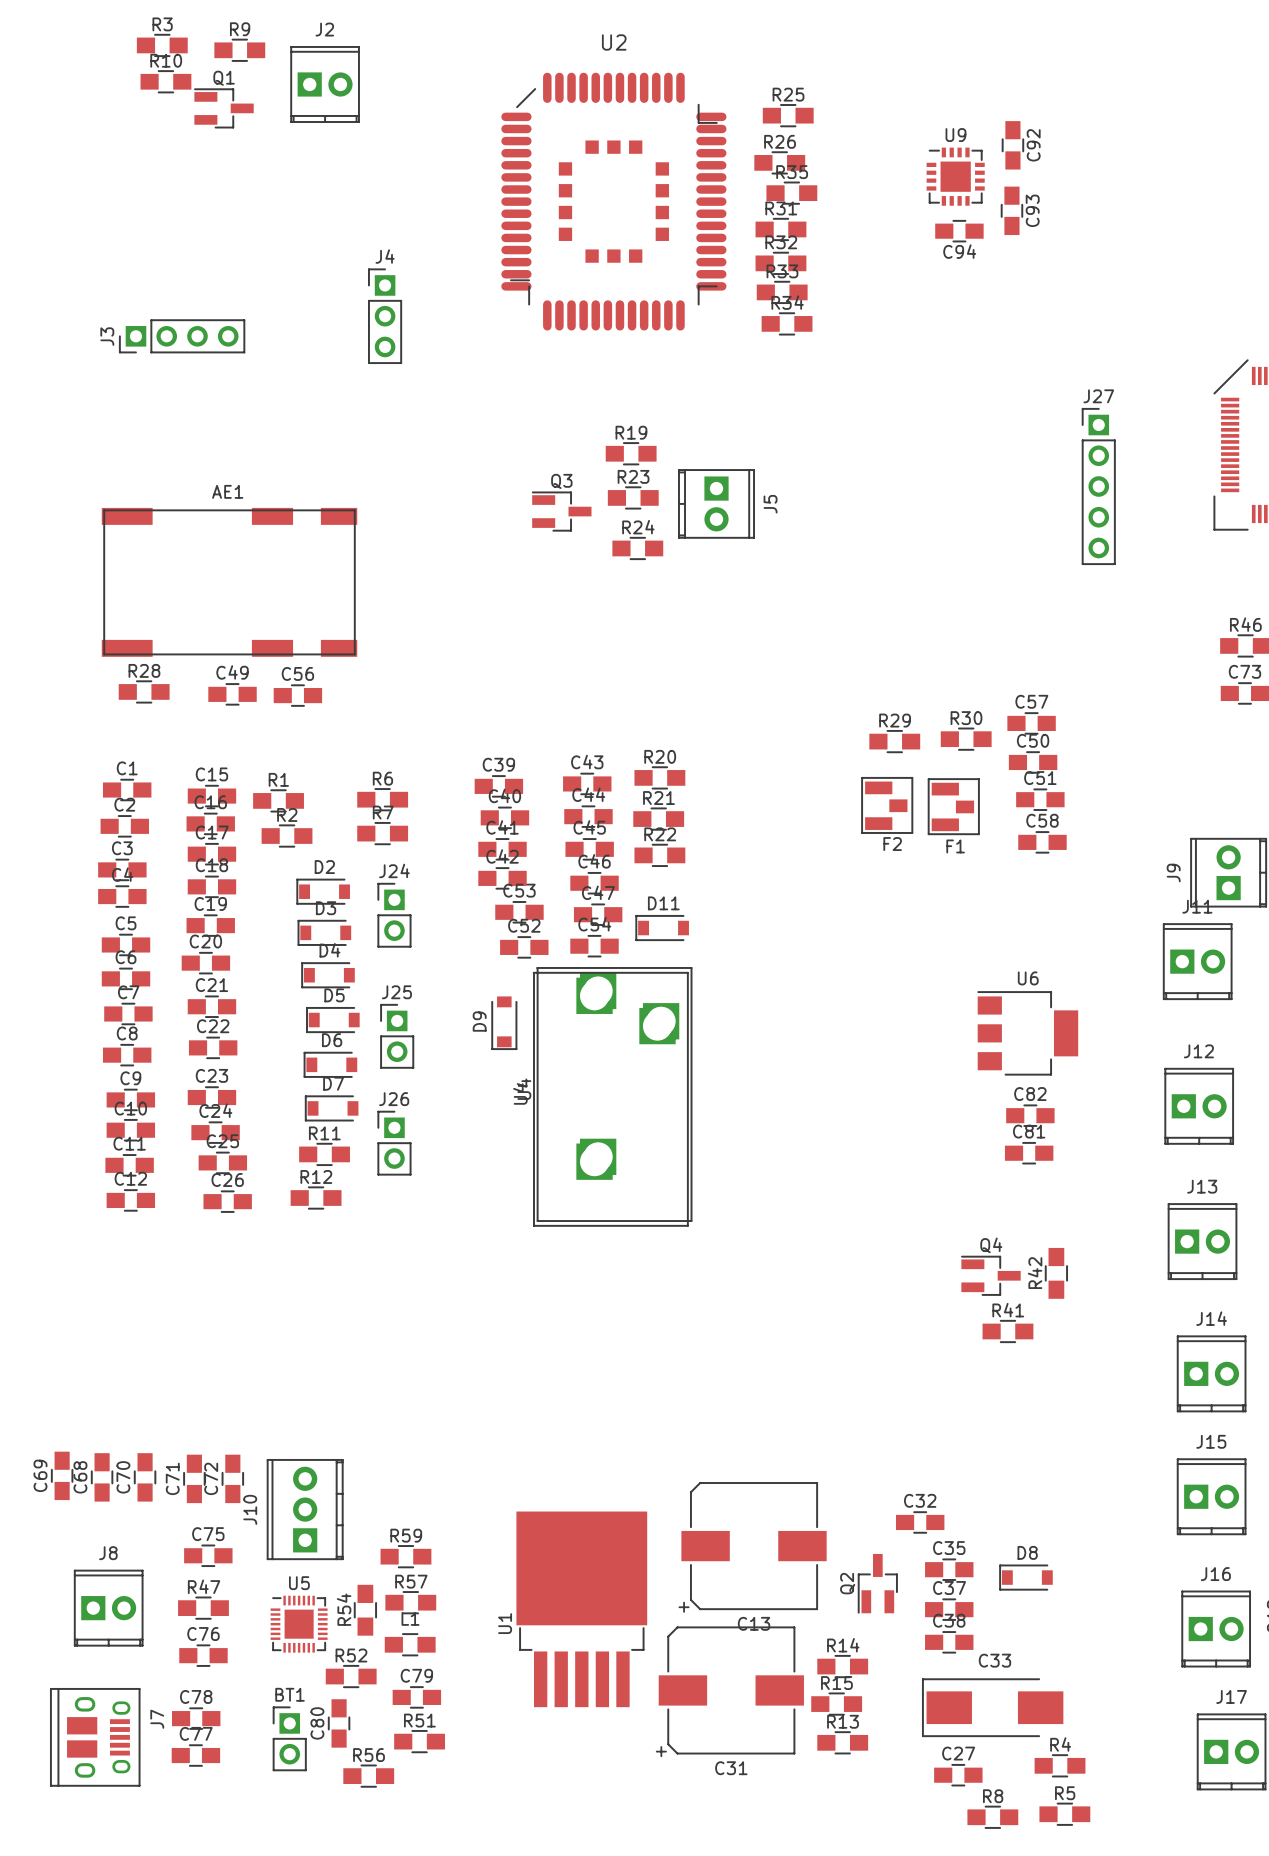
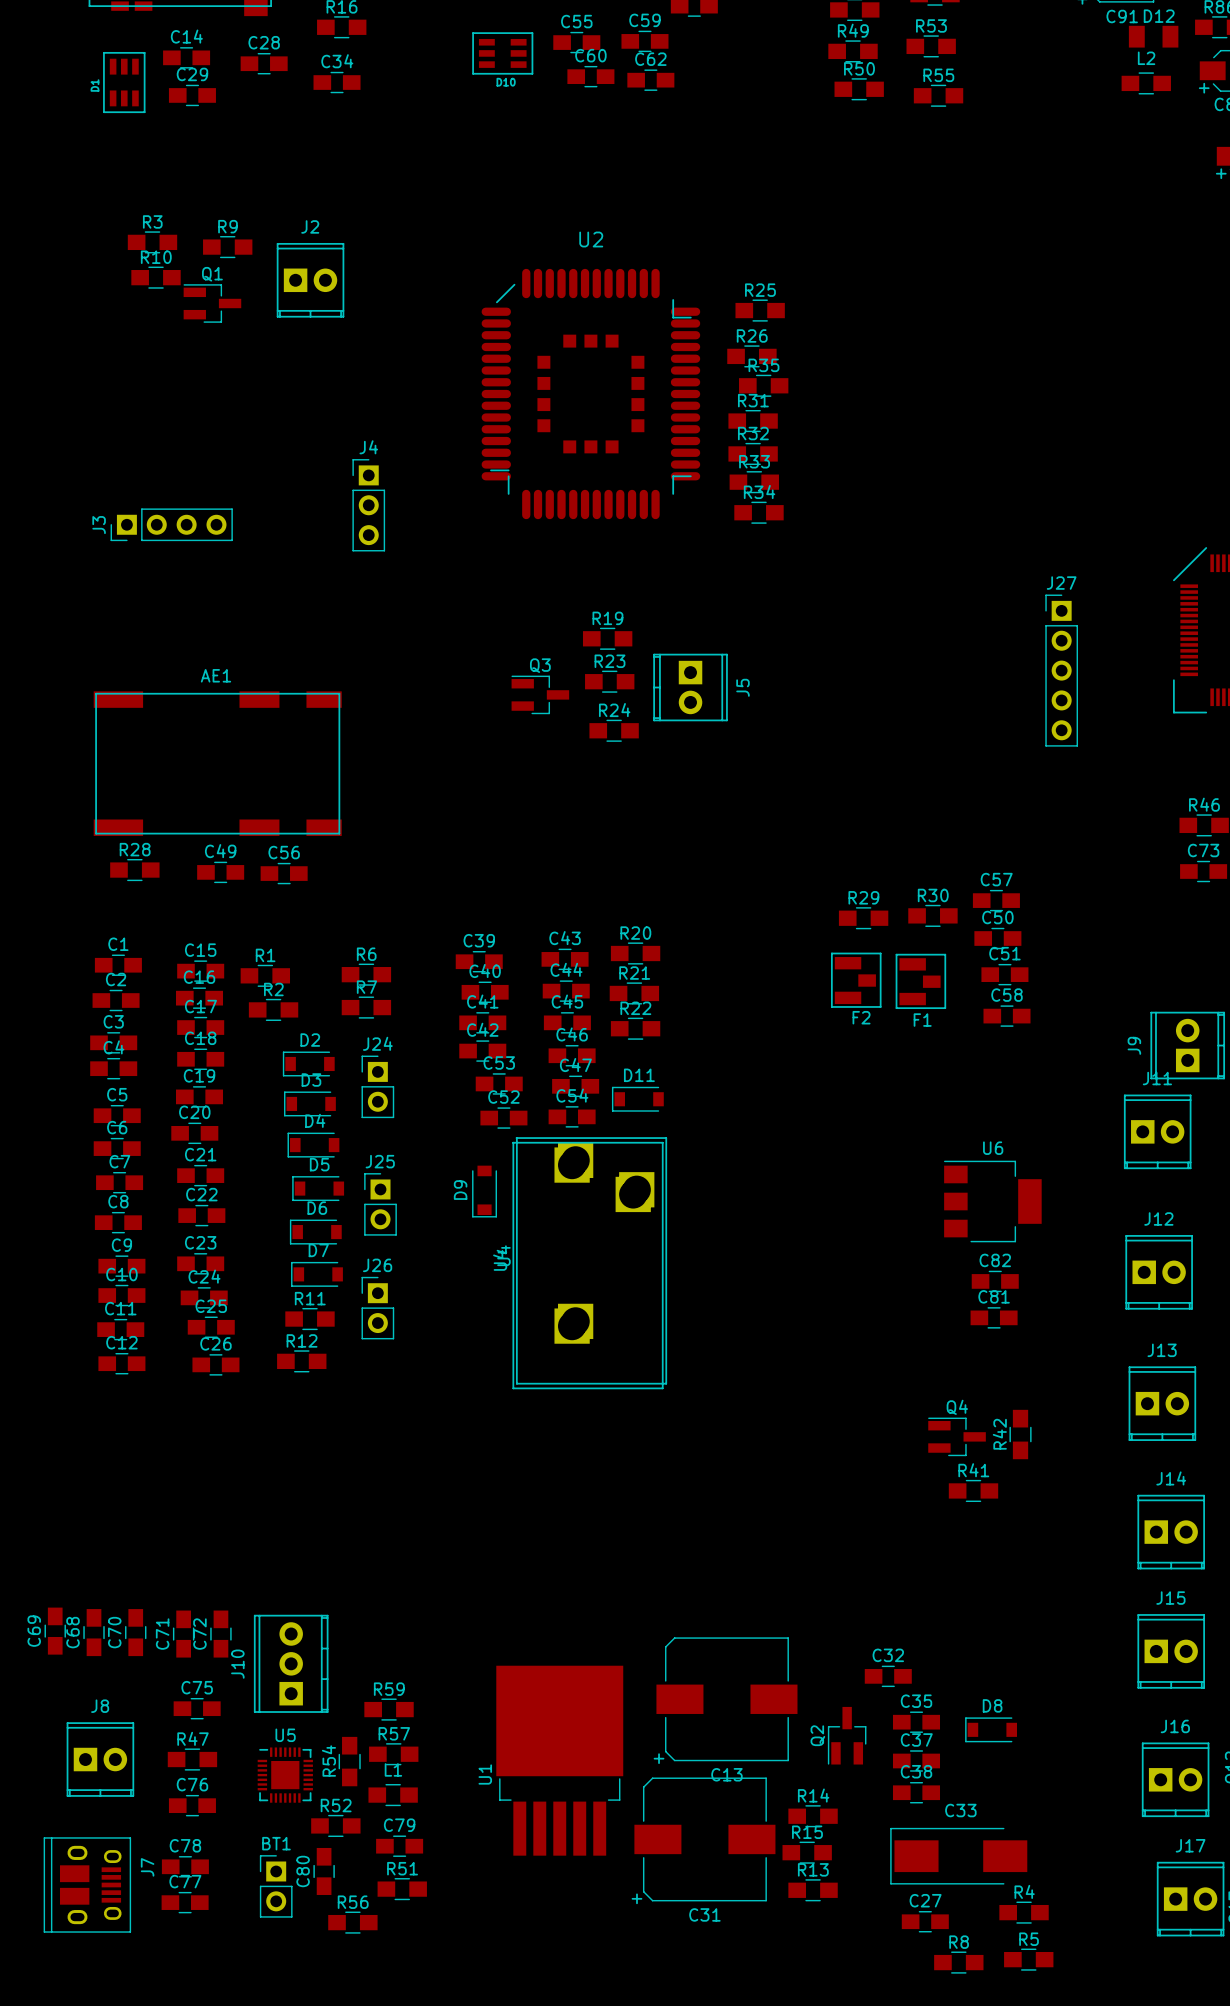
C92: (1012, 145) -> none
U9: (955, 176) -> none
C93: (1011, 210) -> none
C94: (959, 231) -> none

